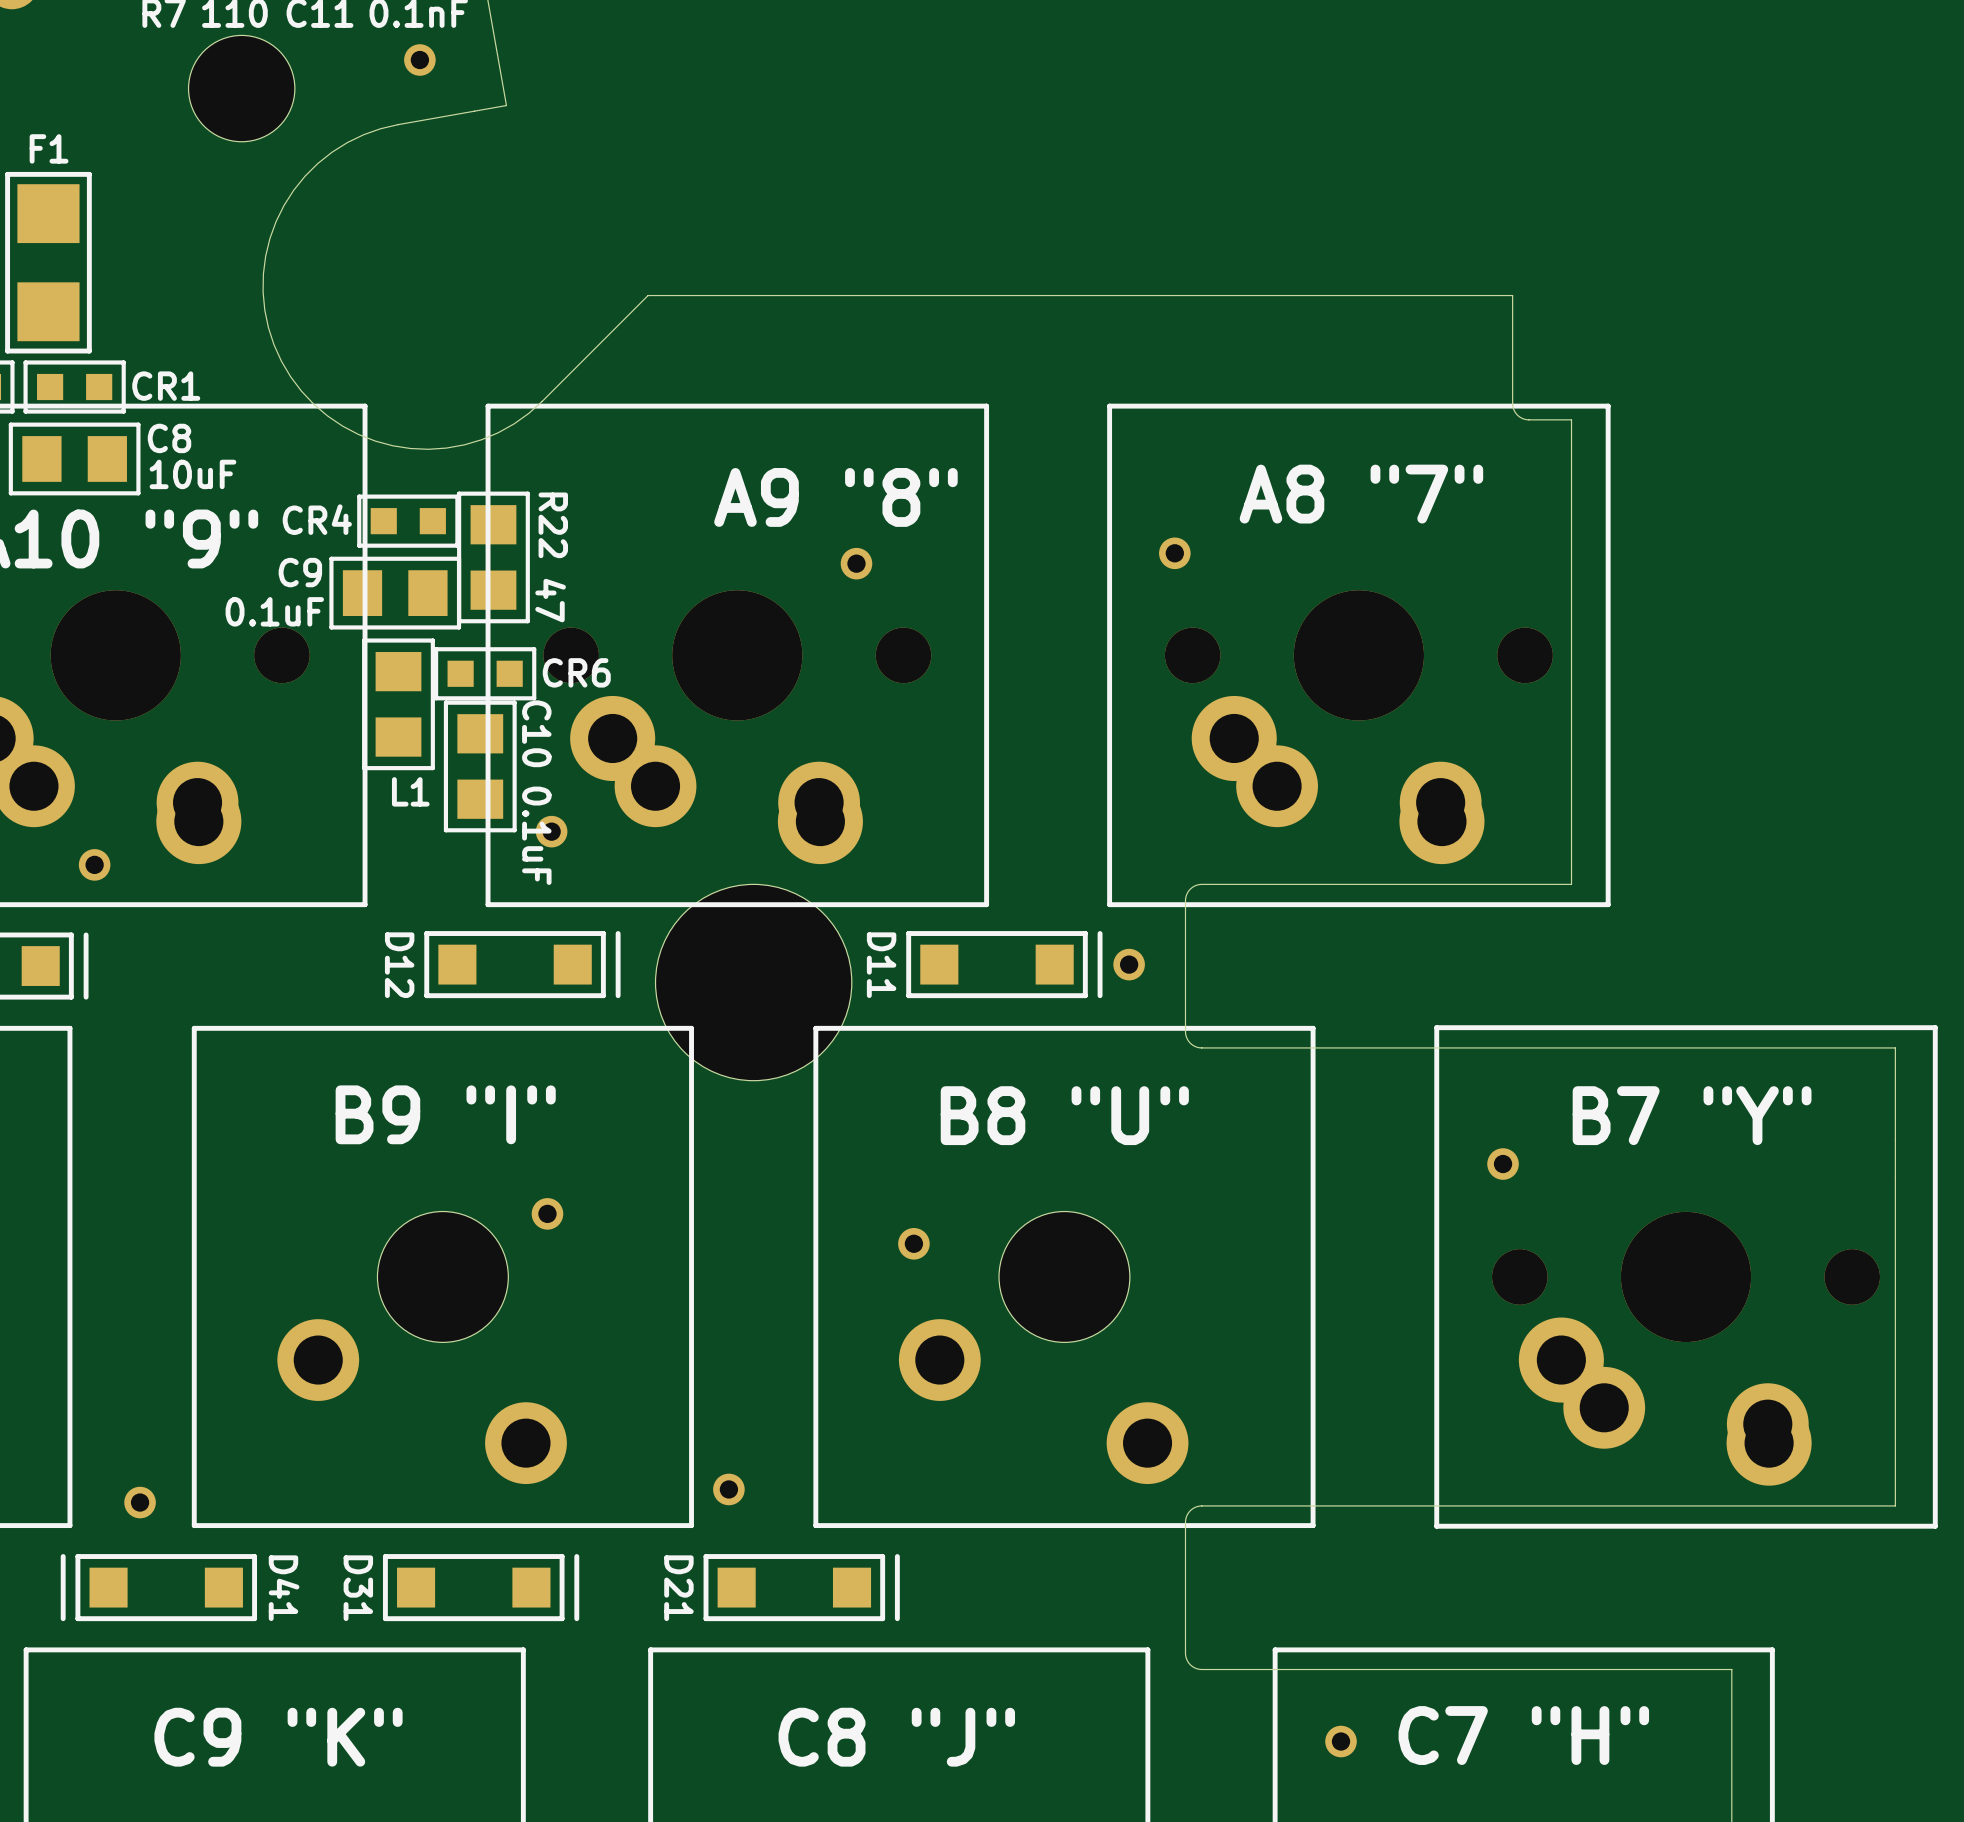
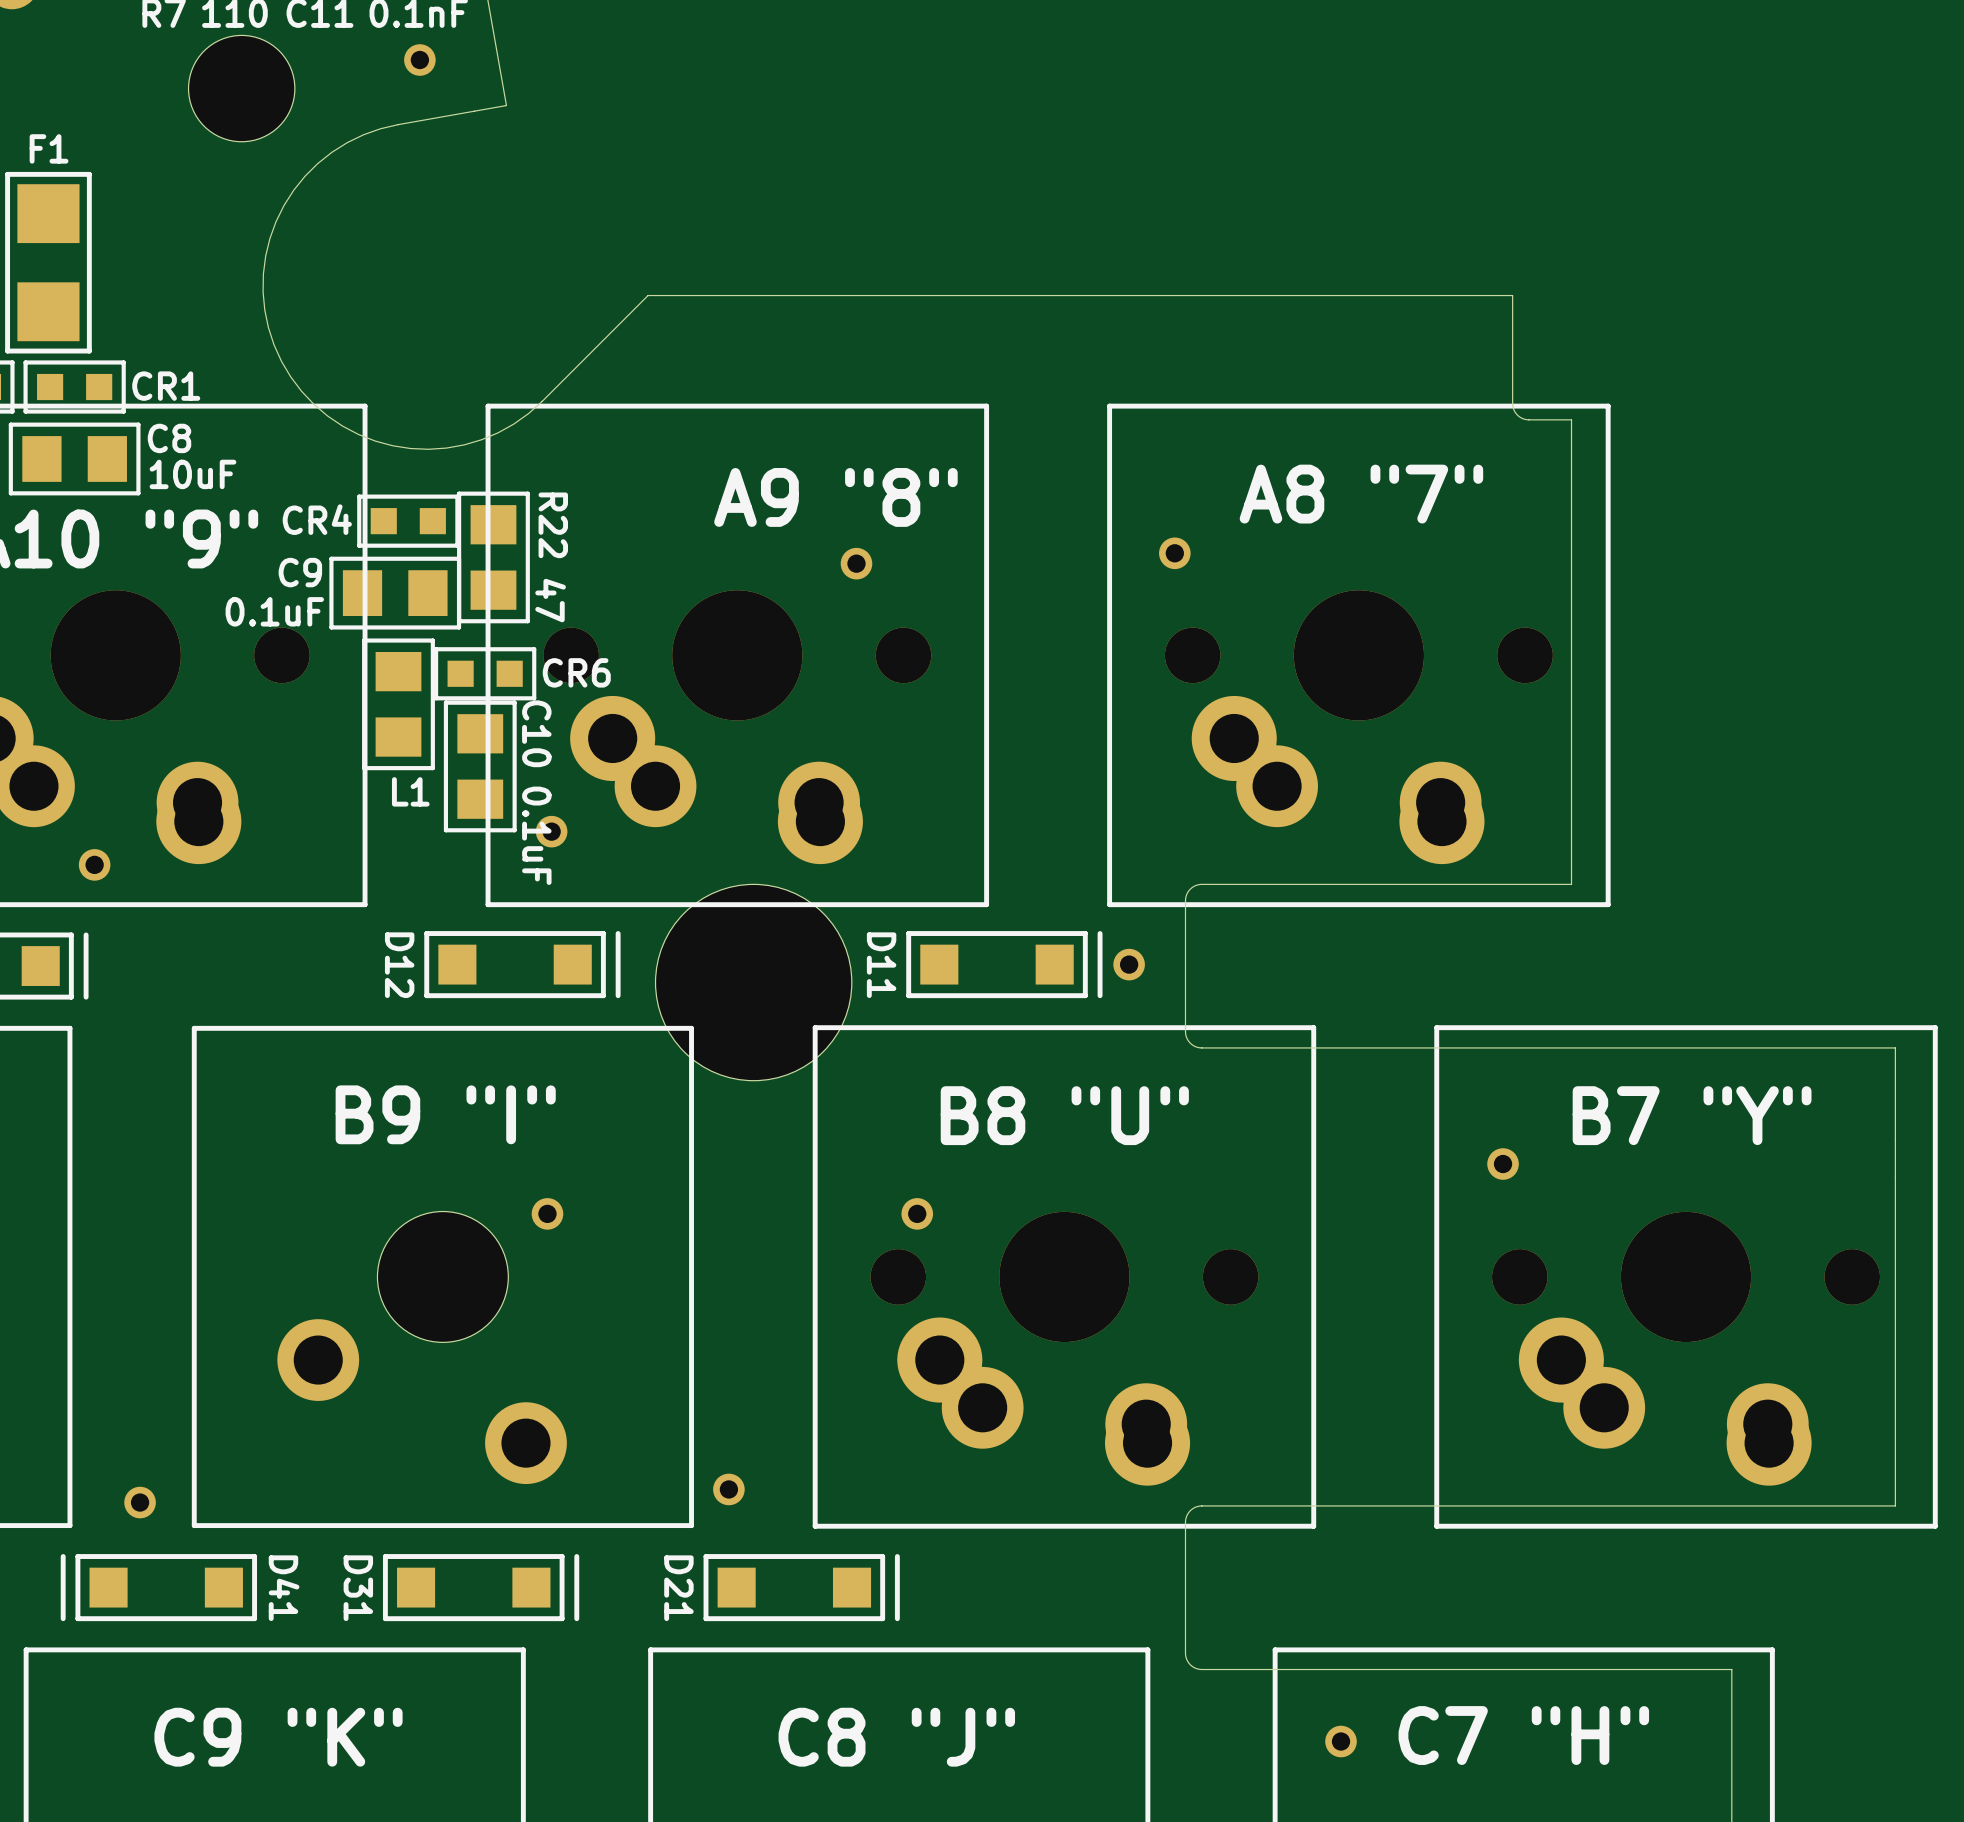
part footprint: [813, 1025, 1316, 1529] -> [812, 1025, 1317, 1529]
part position: (913, 1243) -> (917, 1213)

